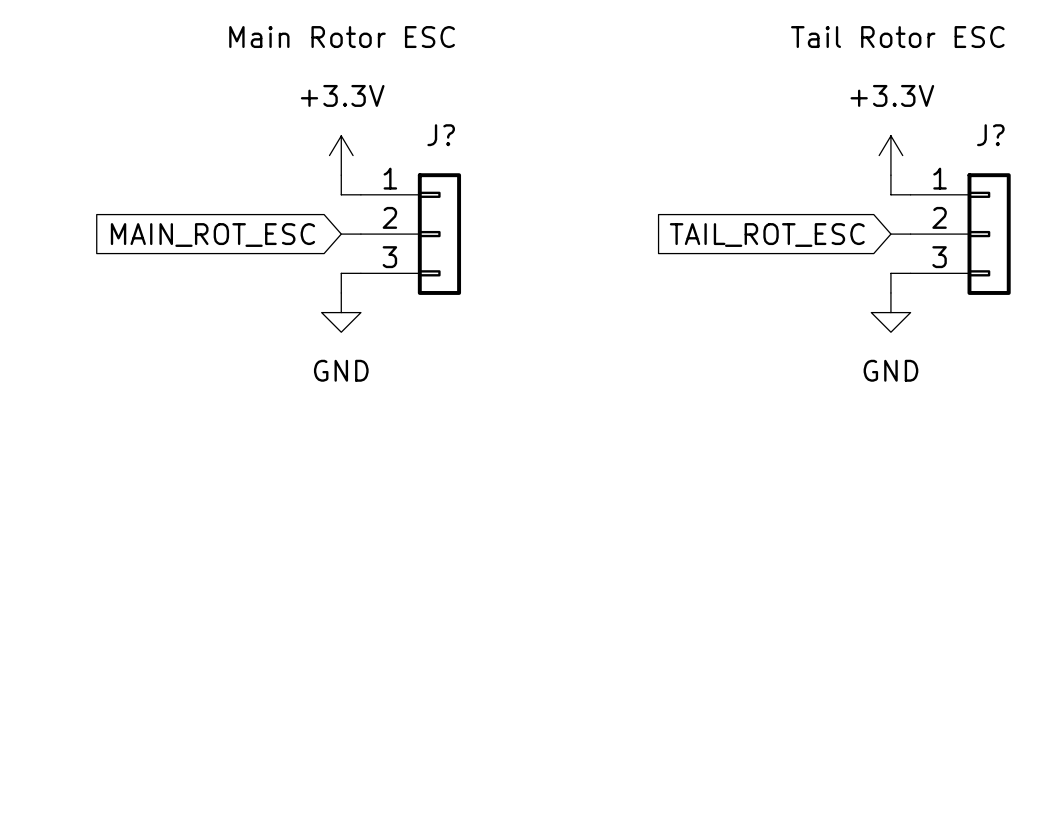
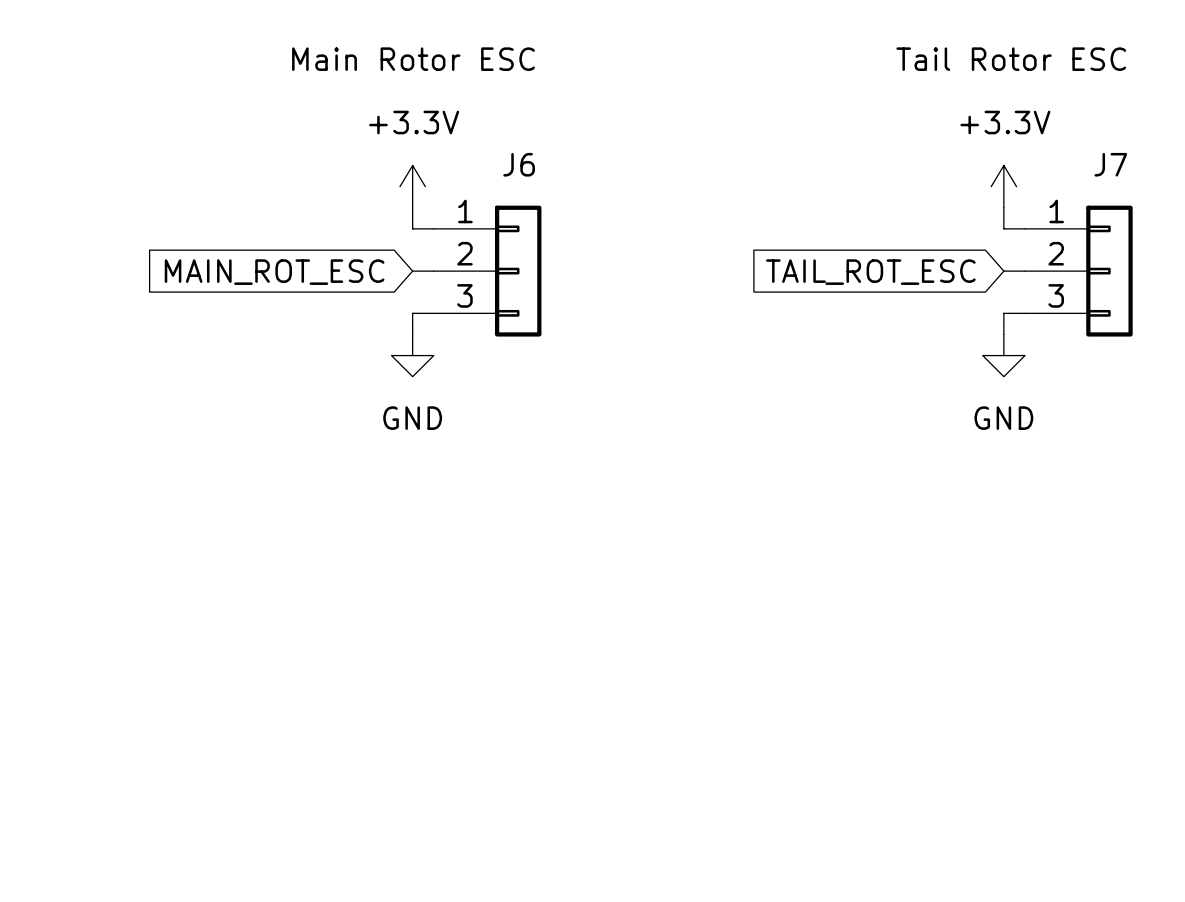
J? name: J? (441, 135) -> J6 (519, 164)
J? name: J? (990, 135) -> J7 (1110, 164)

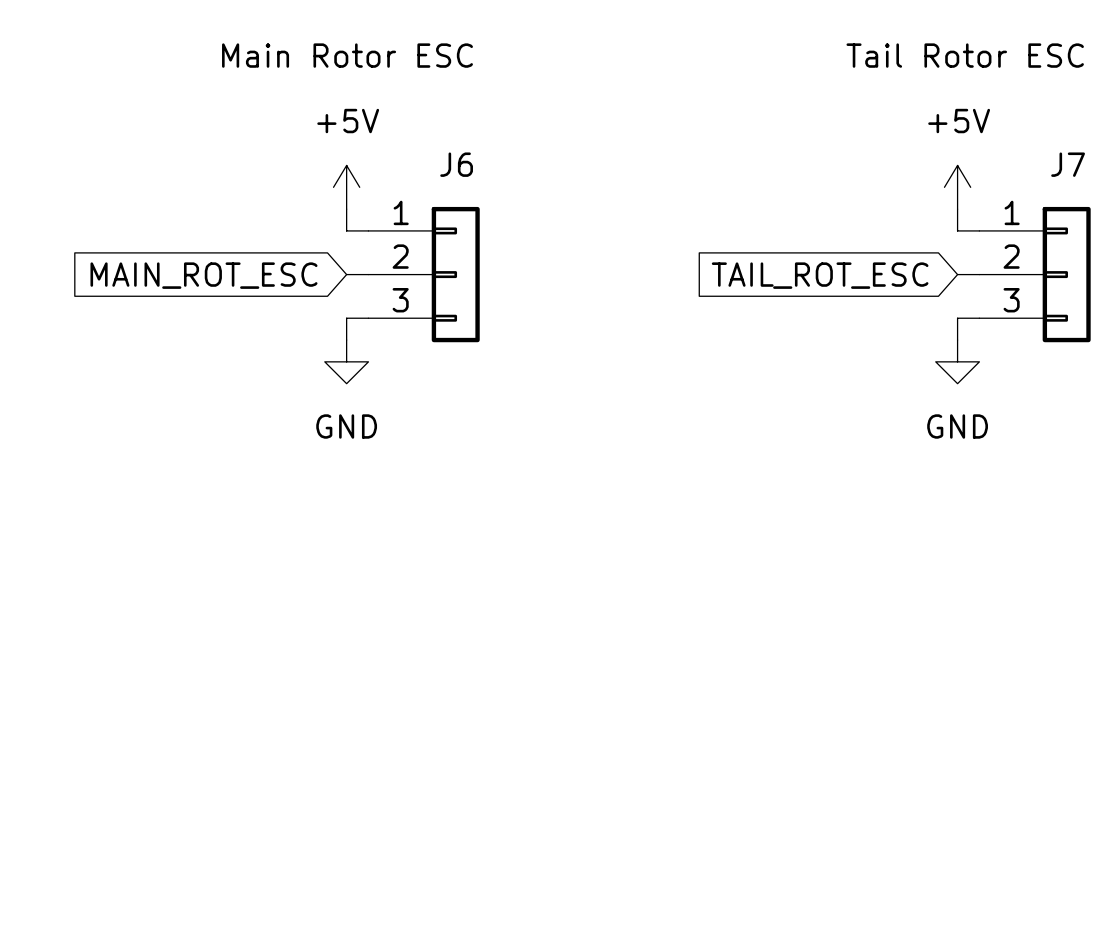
power symbol: +3.3V (412, 186) -> +5V (346, 187)
power symbol: +3.3V (1003, 186) -> +5V (957, 187)

